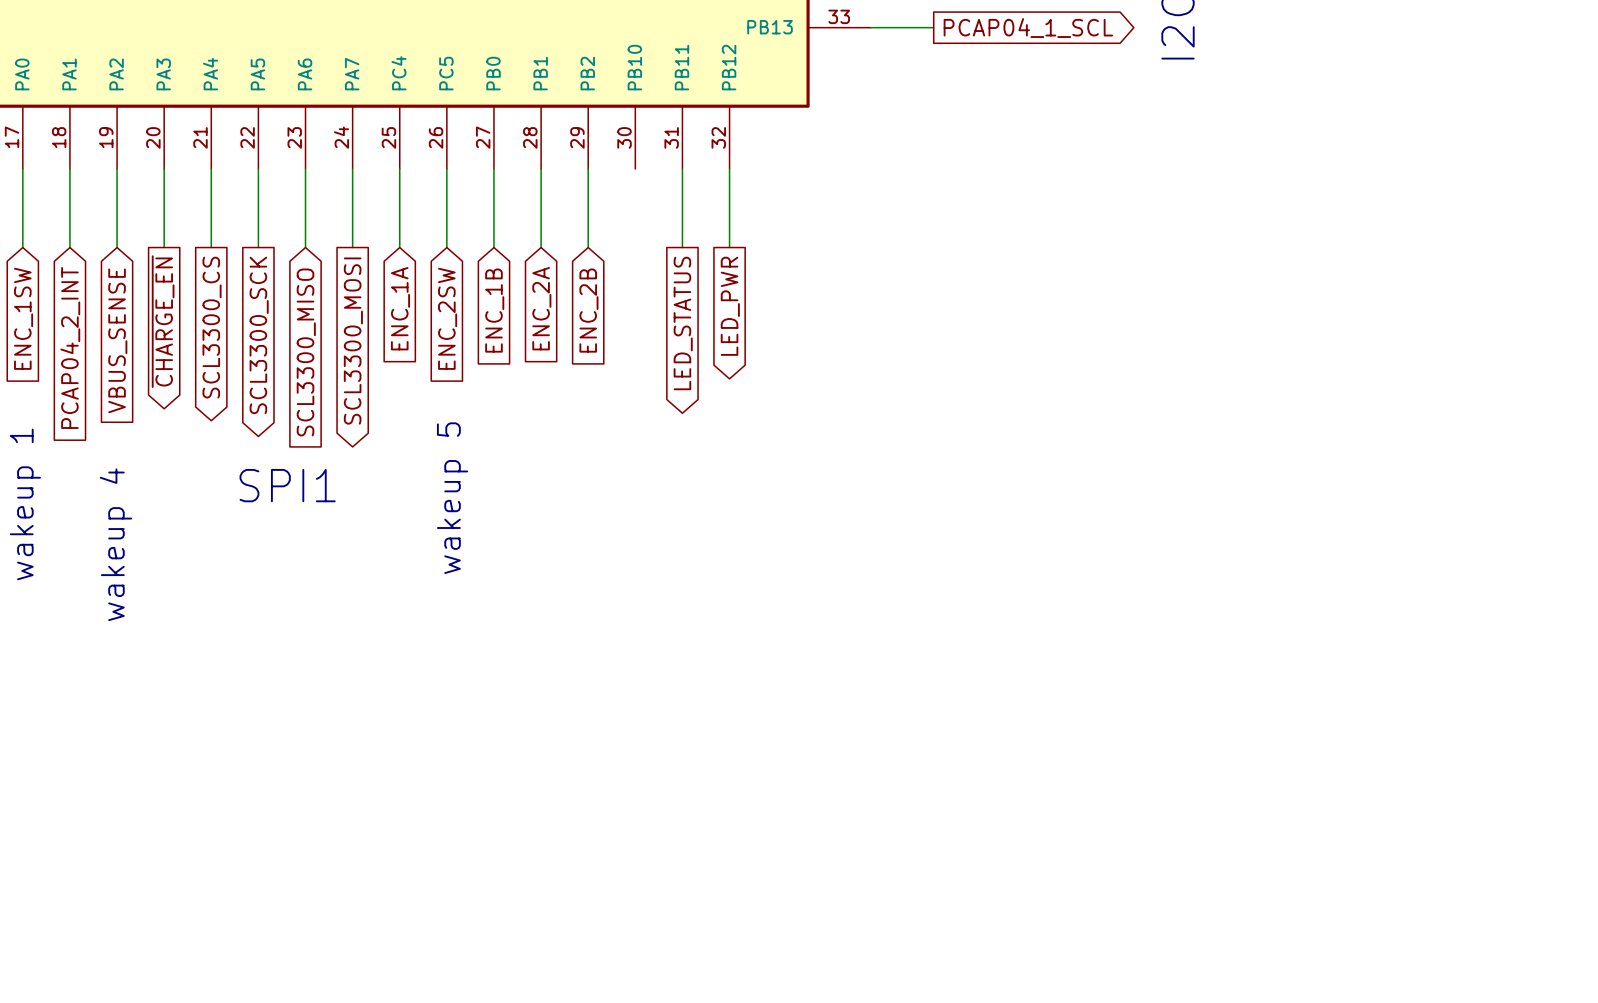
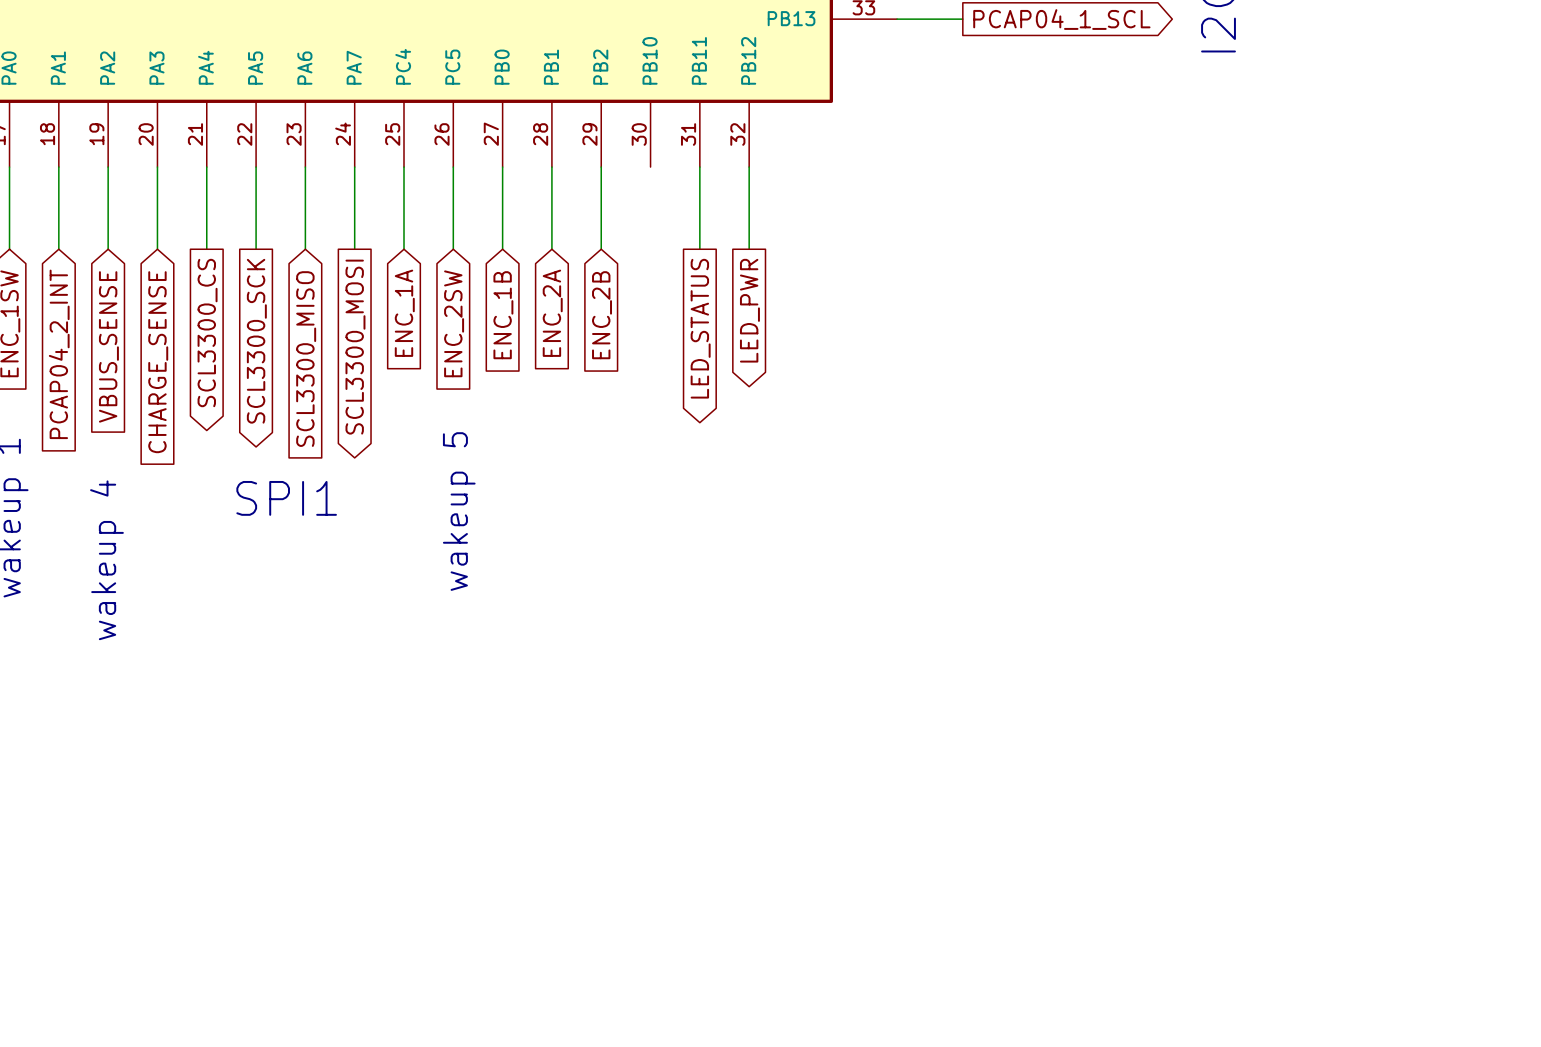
global label shape: output (163, 321) -> input (158, 362)
global label: ~{CHARGE_EN} (163, 321) -> CHARGE_SENSE (158, 362)

